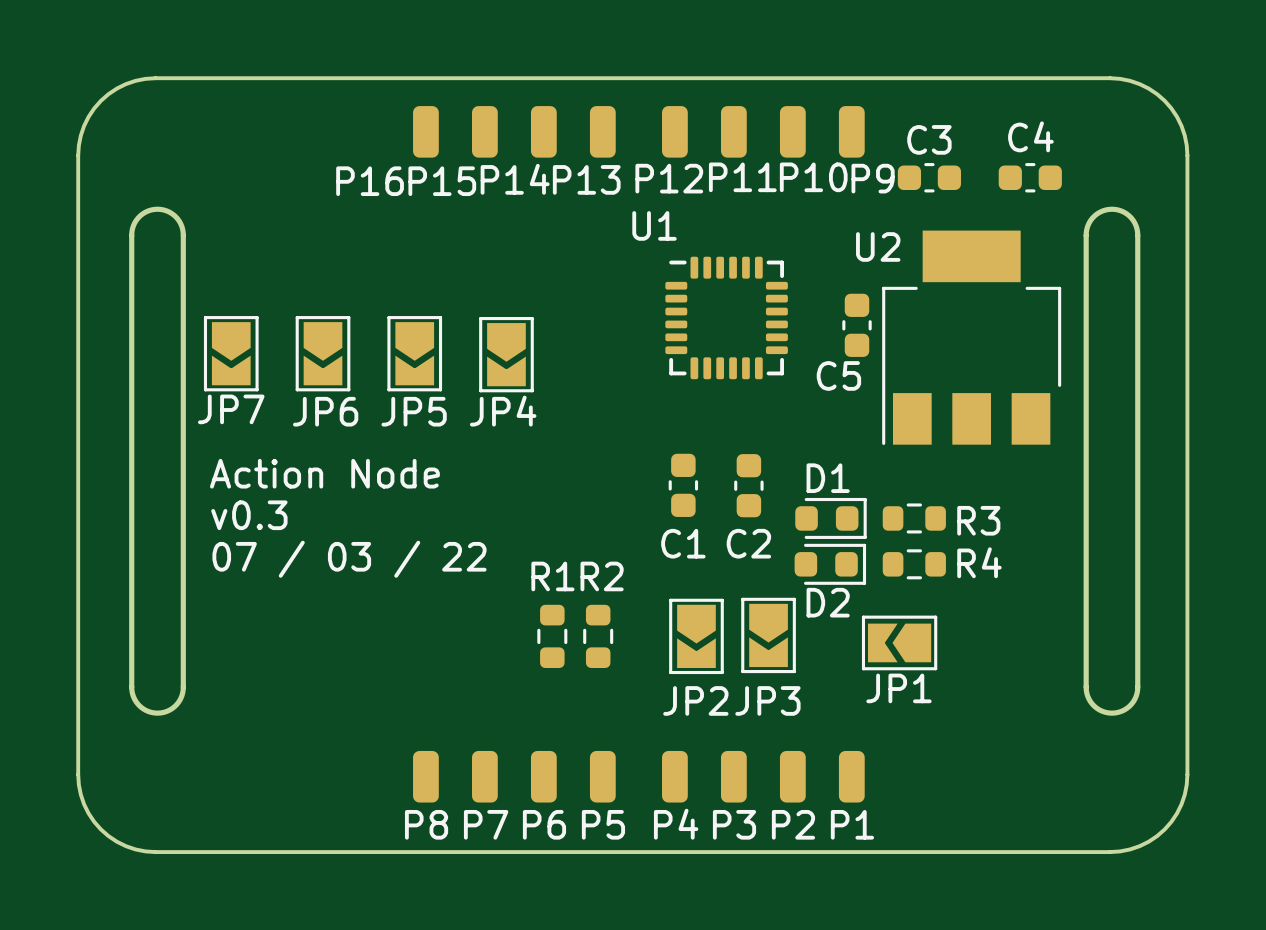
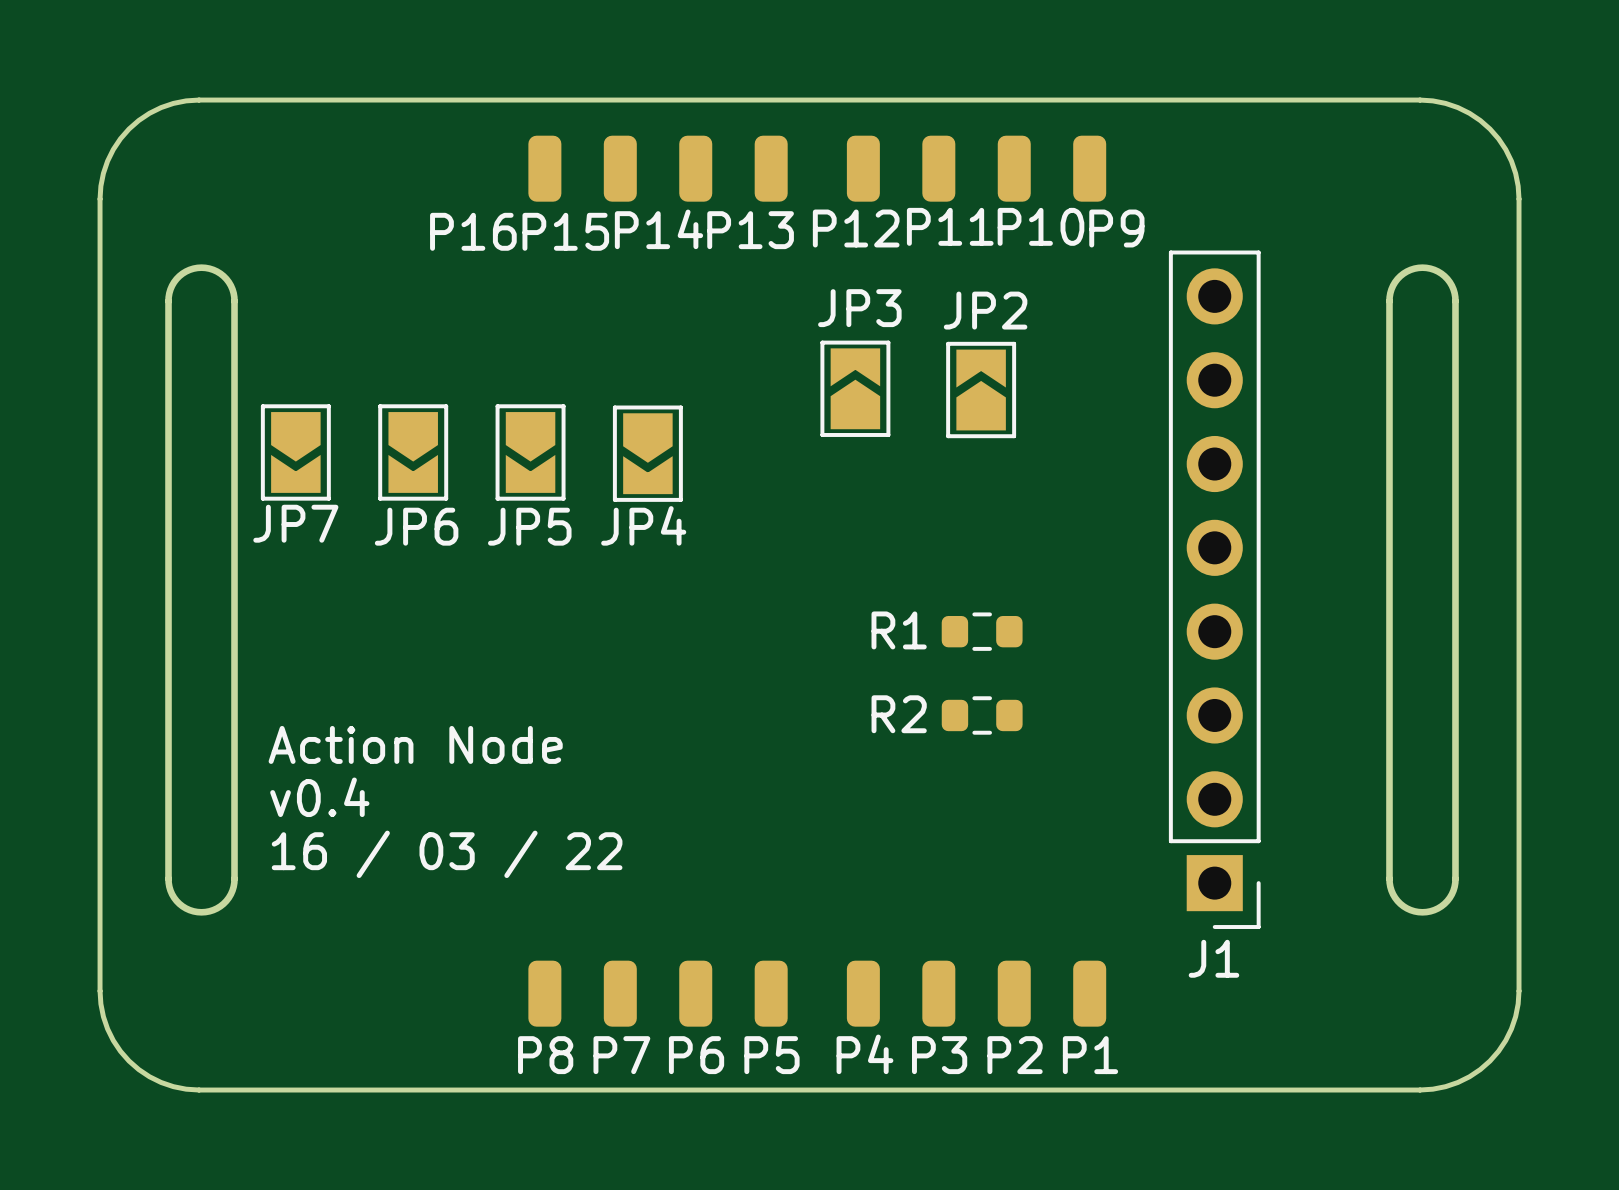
C3: (929, 177) -> none
C4: (1030, 177) -> none
U1: (726, 317) -> none
C5: (857, 325) -> none
U2: (971, 337) -> none
J1: none -> (1214, 589)
text position: Action Node (324, 473) -> Action Node (415, 744)
C1: (683, 485) -> none
C2: (748, 485) -> none
text: v0.3 (249, 515) -> none
D1: (830, 518) -> none
R3: (914, 518) -> none
text: 07 / 03 / 22 (349, 559) -> none
D2: (830, 564) -> none
R4: (914, 564) -> none
R1 name position: R1 (552, 576) -> R1 (899, 630)
R2 name position: R2 (602, 576) -> R2 (899, 714)
text: none -> v0.4 (319, 797)
JP3 rotation: 0° (768, 635) -> 180° (855, 388)
JP3 position: (768, 635) -> (855, 388)
R1 rotation: 0° (552, 636) -> 90° clockwise (982, 631)
R1 position: (552, 636) -> (982, 631)
R2 rotation: 0° (598, 636) -> 90° clockwise (982, 715)
R2 position: (598, 636) -> (982, 715)
JP2 rotation: 0° (696, 636) -> 180° (981, 390)
JP2 position: (696, 636) -> (981, 390)
JP1: (899, 642) -> none
text: none -> 16 / 03 / 22 (447, 854)

